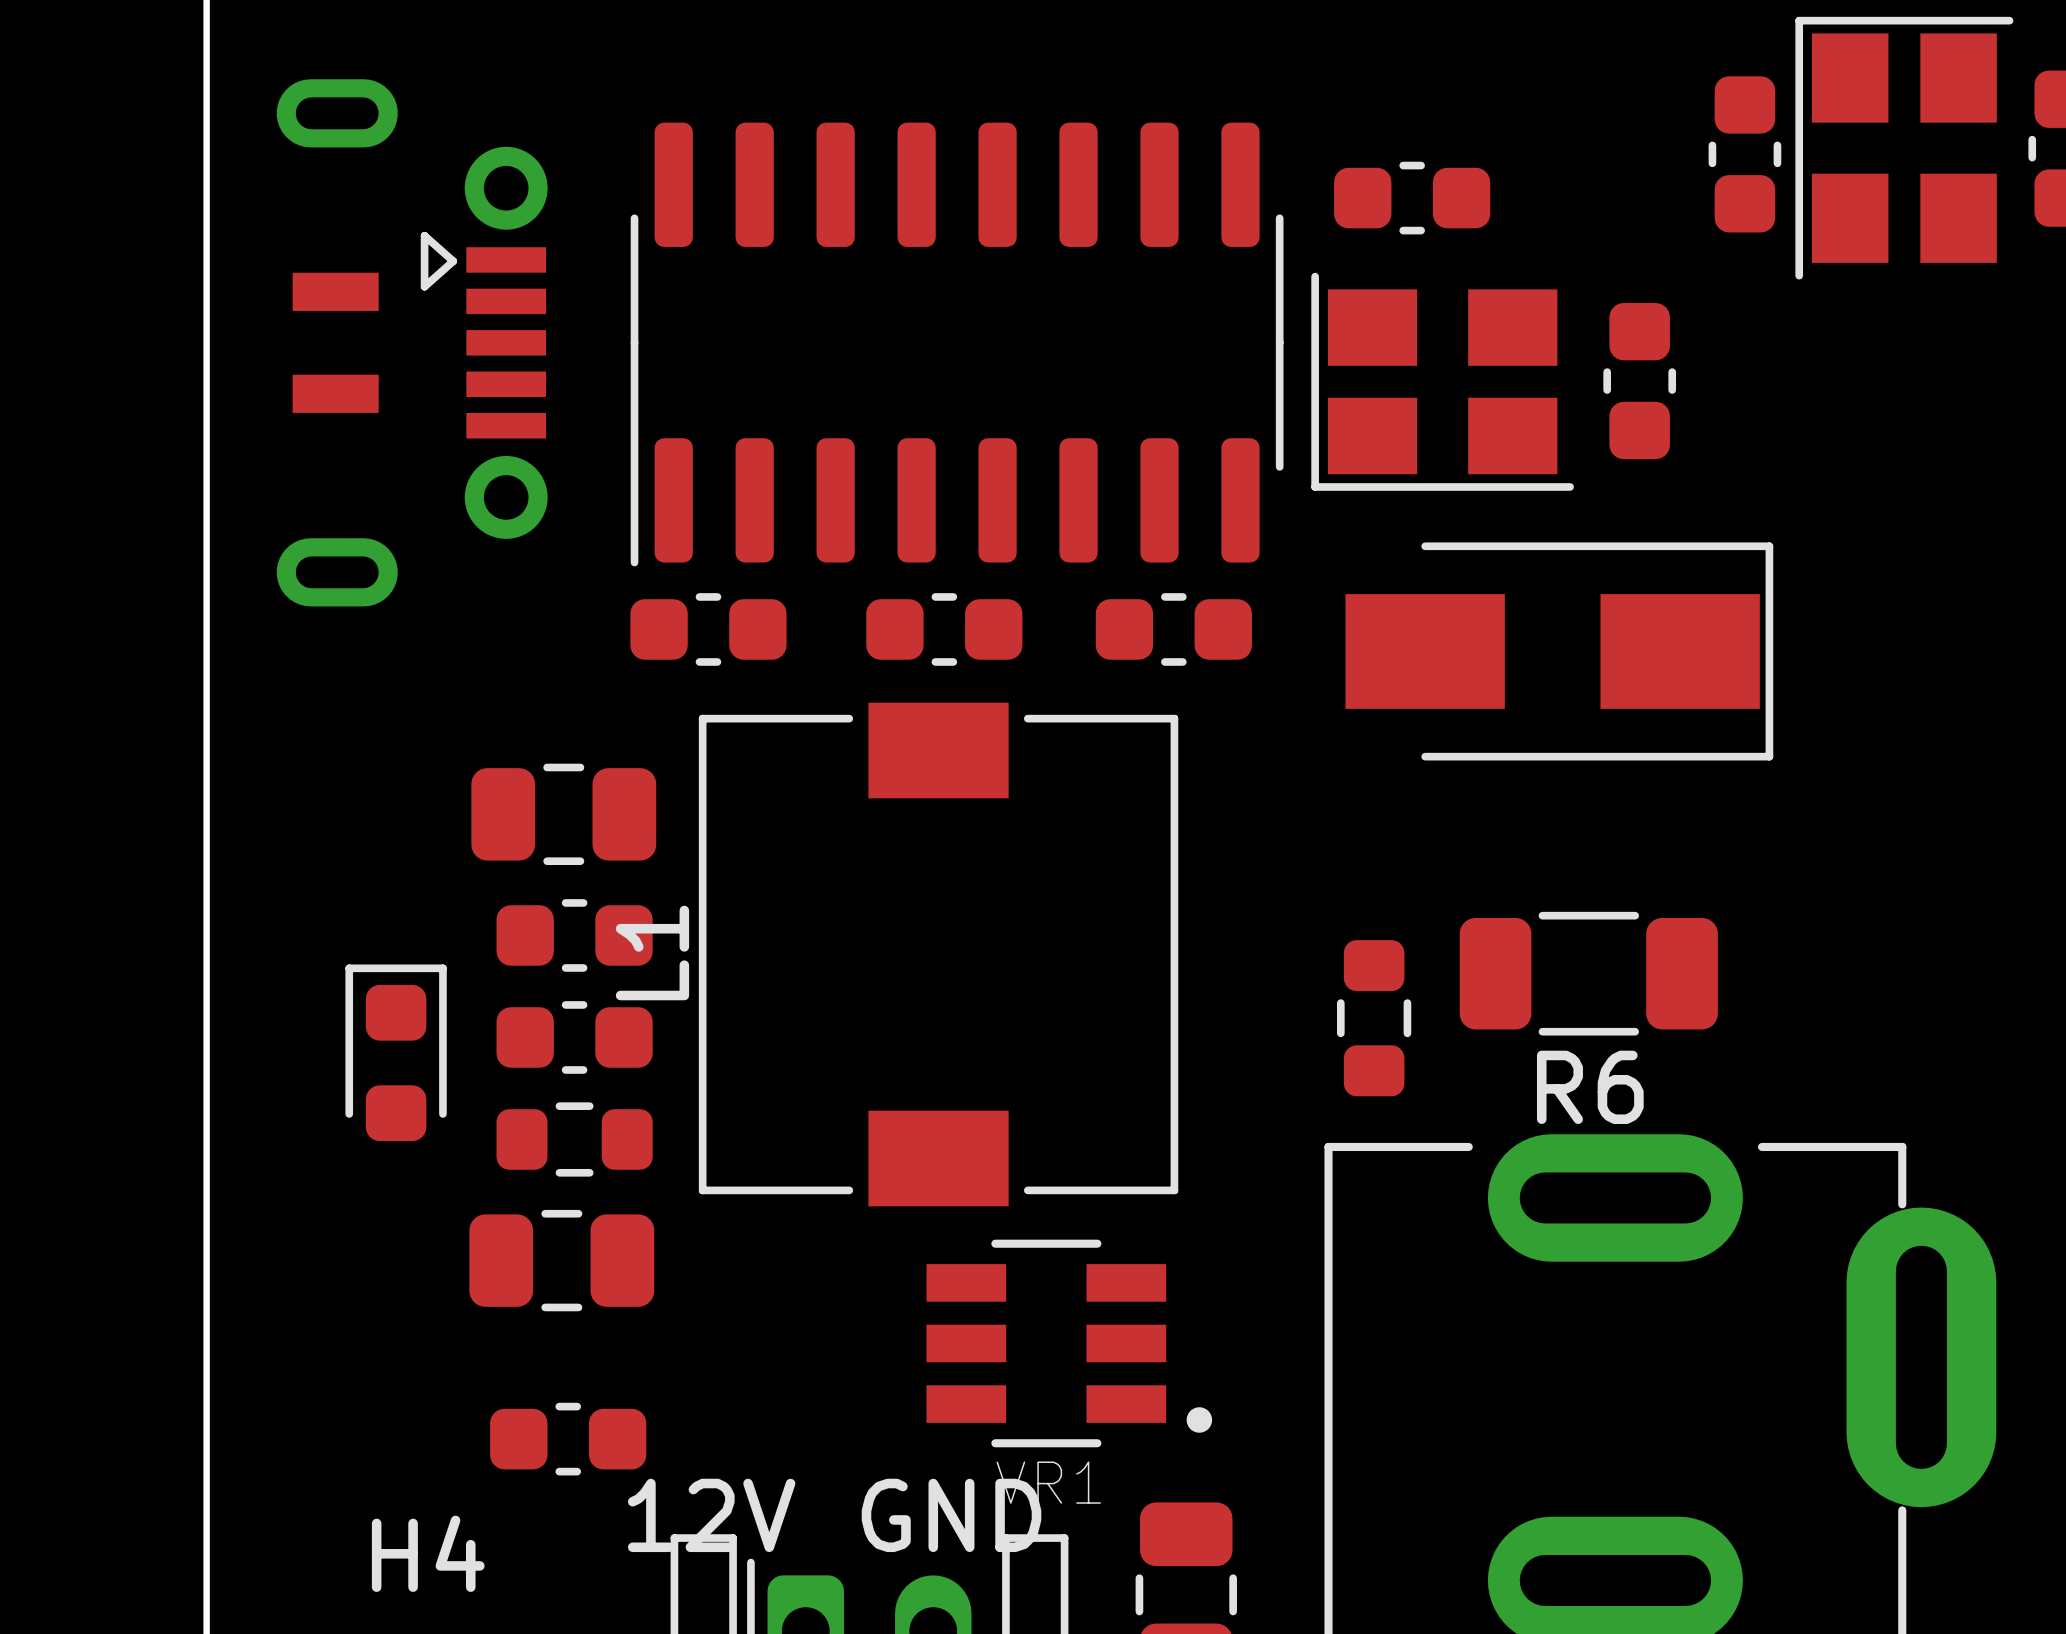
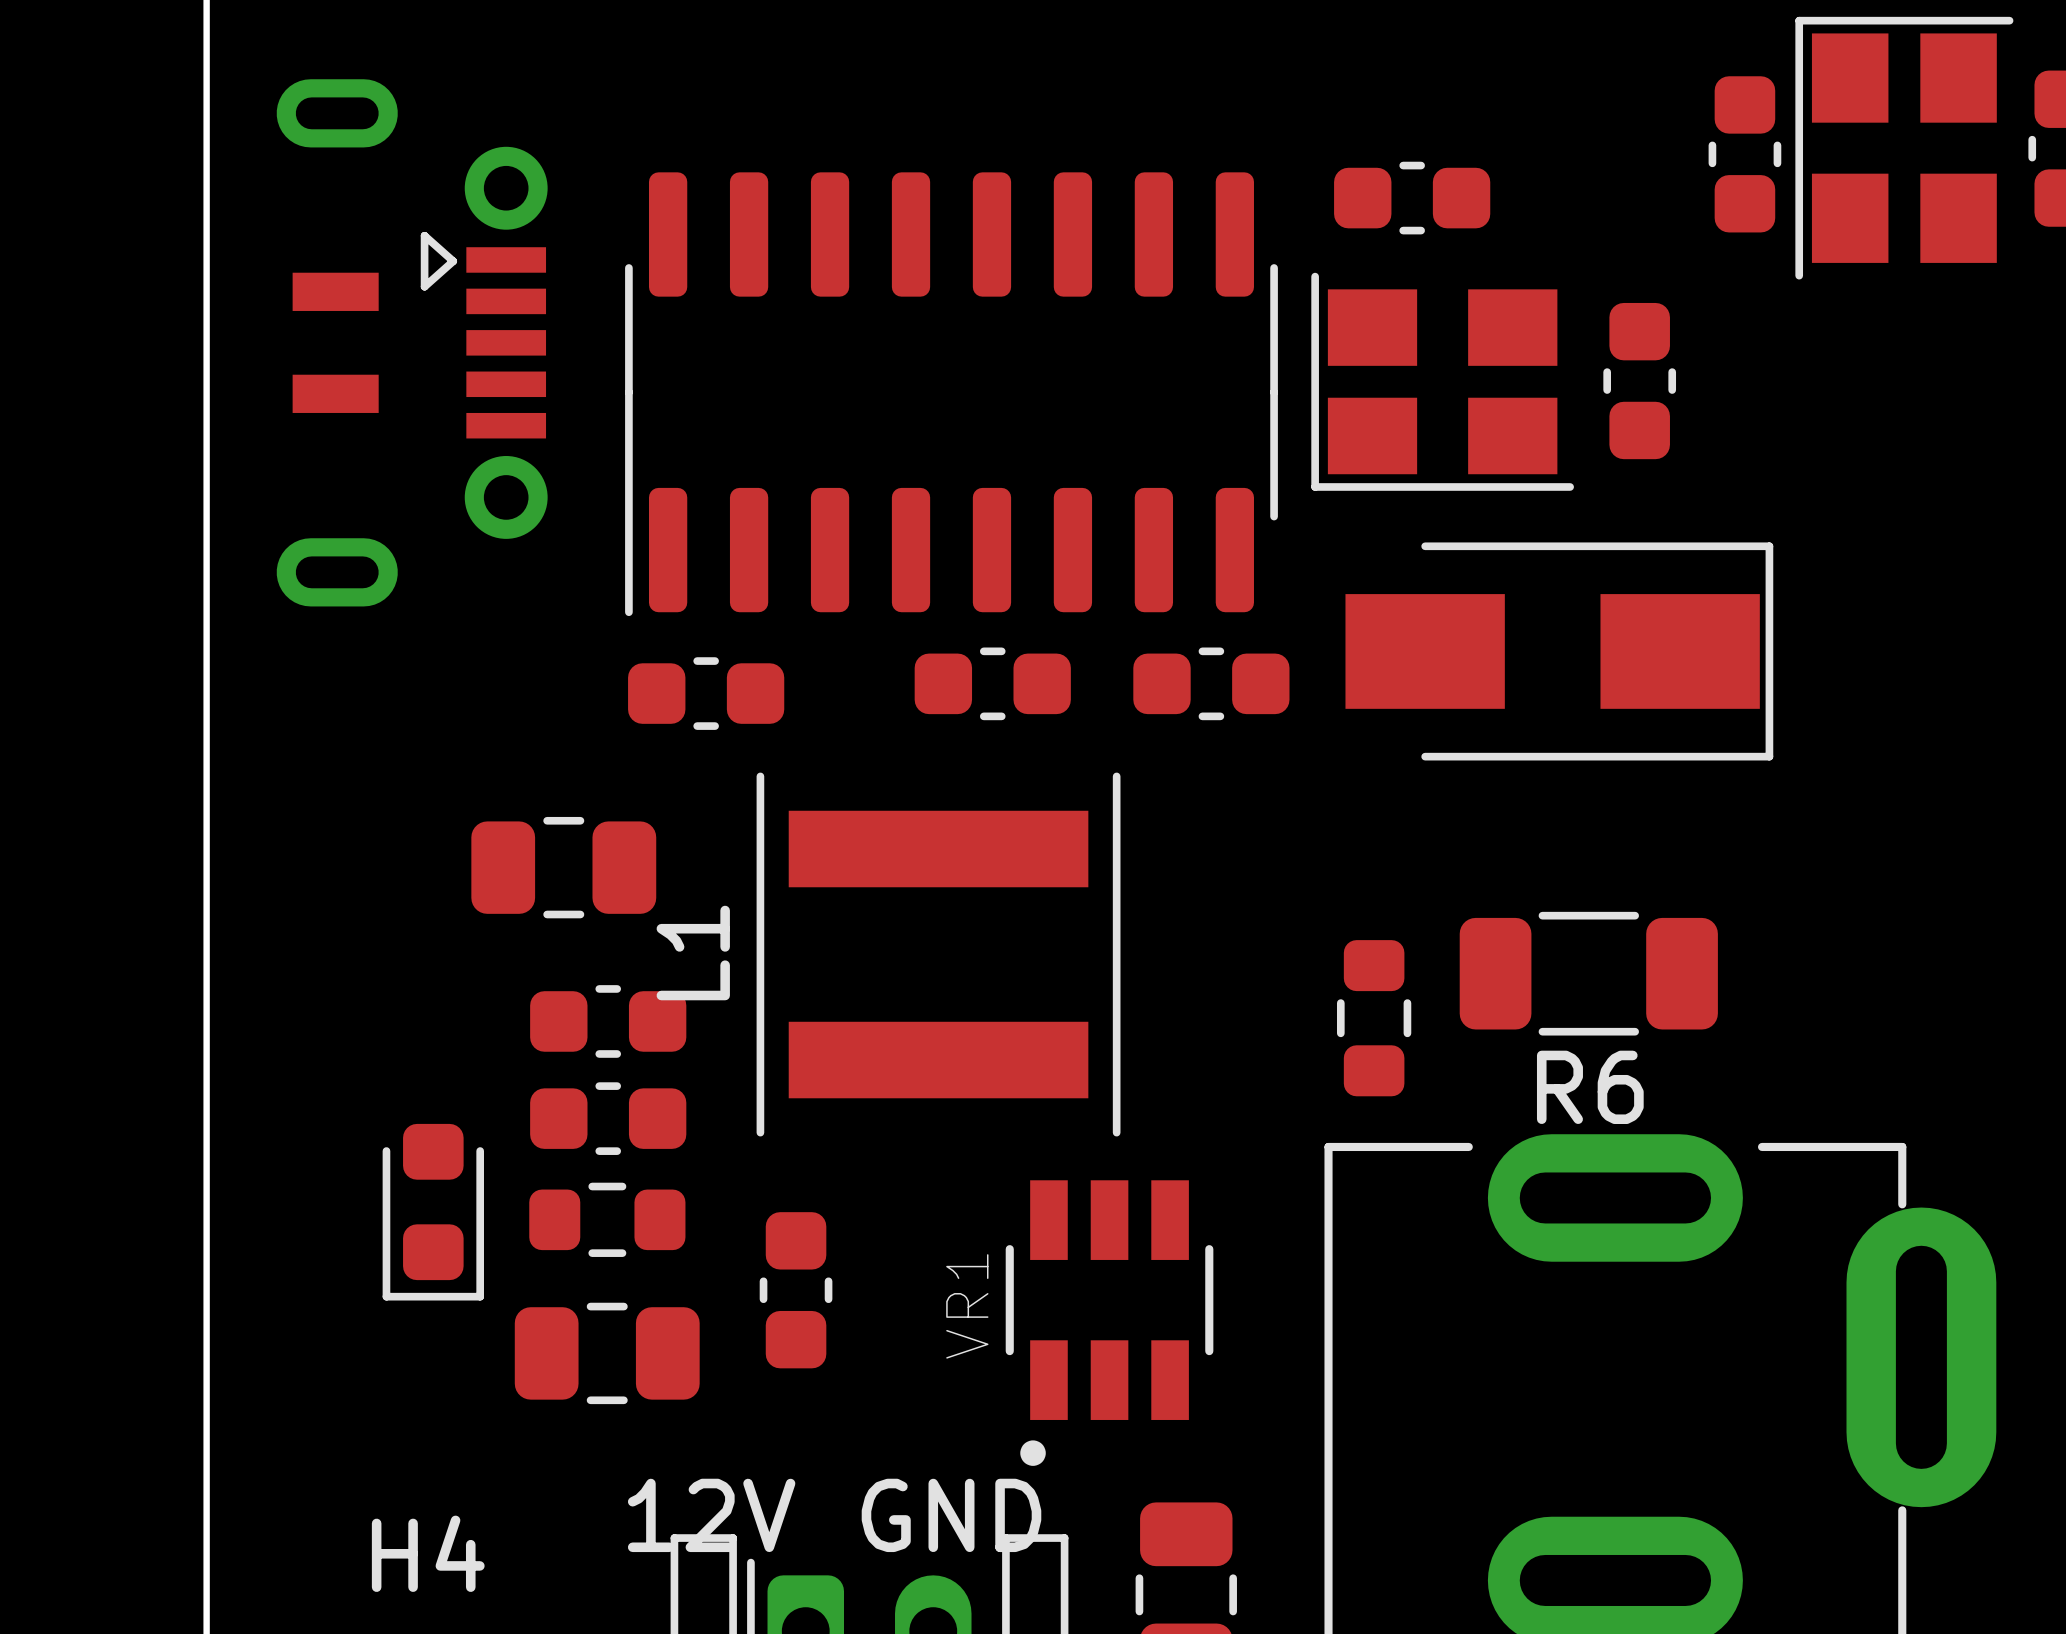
part position: (957, 344) -> (951, 394)
part position: (708, 629) -> (706, 693)
part position: (944, 629) -> (992, 683)
part position: (1173, 629) -> (1211, 683)
L1 footprint: [698, 702, 1179, 1207] -> [756, 772, 1121, 1137]
part position: (563, 814) -> (563, 867)
part: (574, 935) -> none
part position: (574, 1037) -> (608, 1021)
part rotation: 0° (396, 1052) -> 180° (433, 1212)
part position: (396, 1052) -> (433, 1212)
part footprint: [496, 1102, 653, 1177] -> [530, 1082, 687, 1155]
part: none -> (607, 1219)
part position: (561, 1260) -> (607, 1353)
part: none -> (796, 1290)
VR1 rotation: 0° (1069, 1343) -> 90° clockwise (1109, 1323)
part: (568, 1439) -> none

